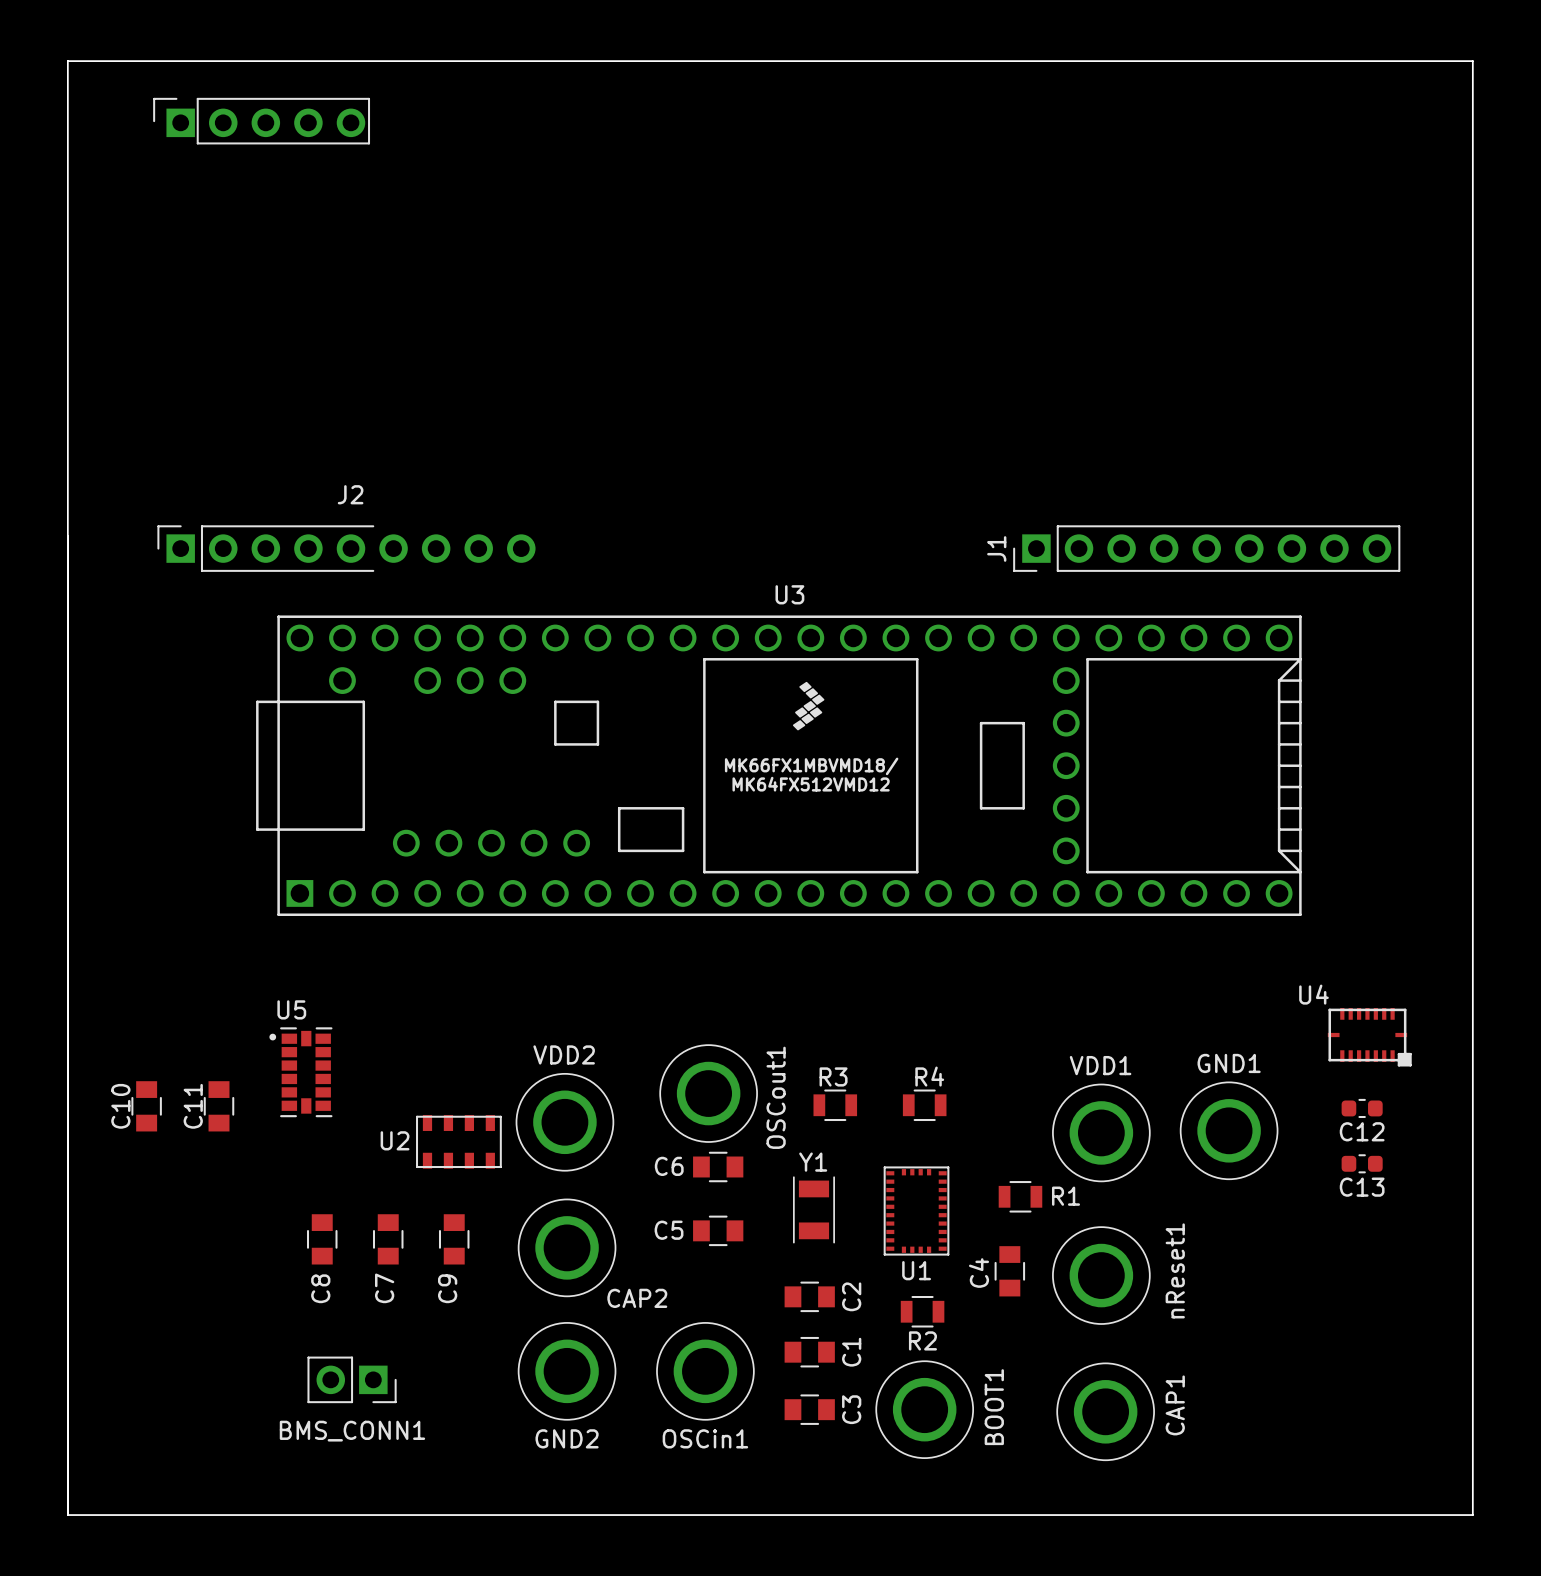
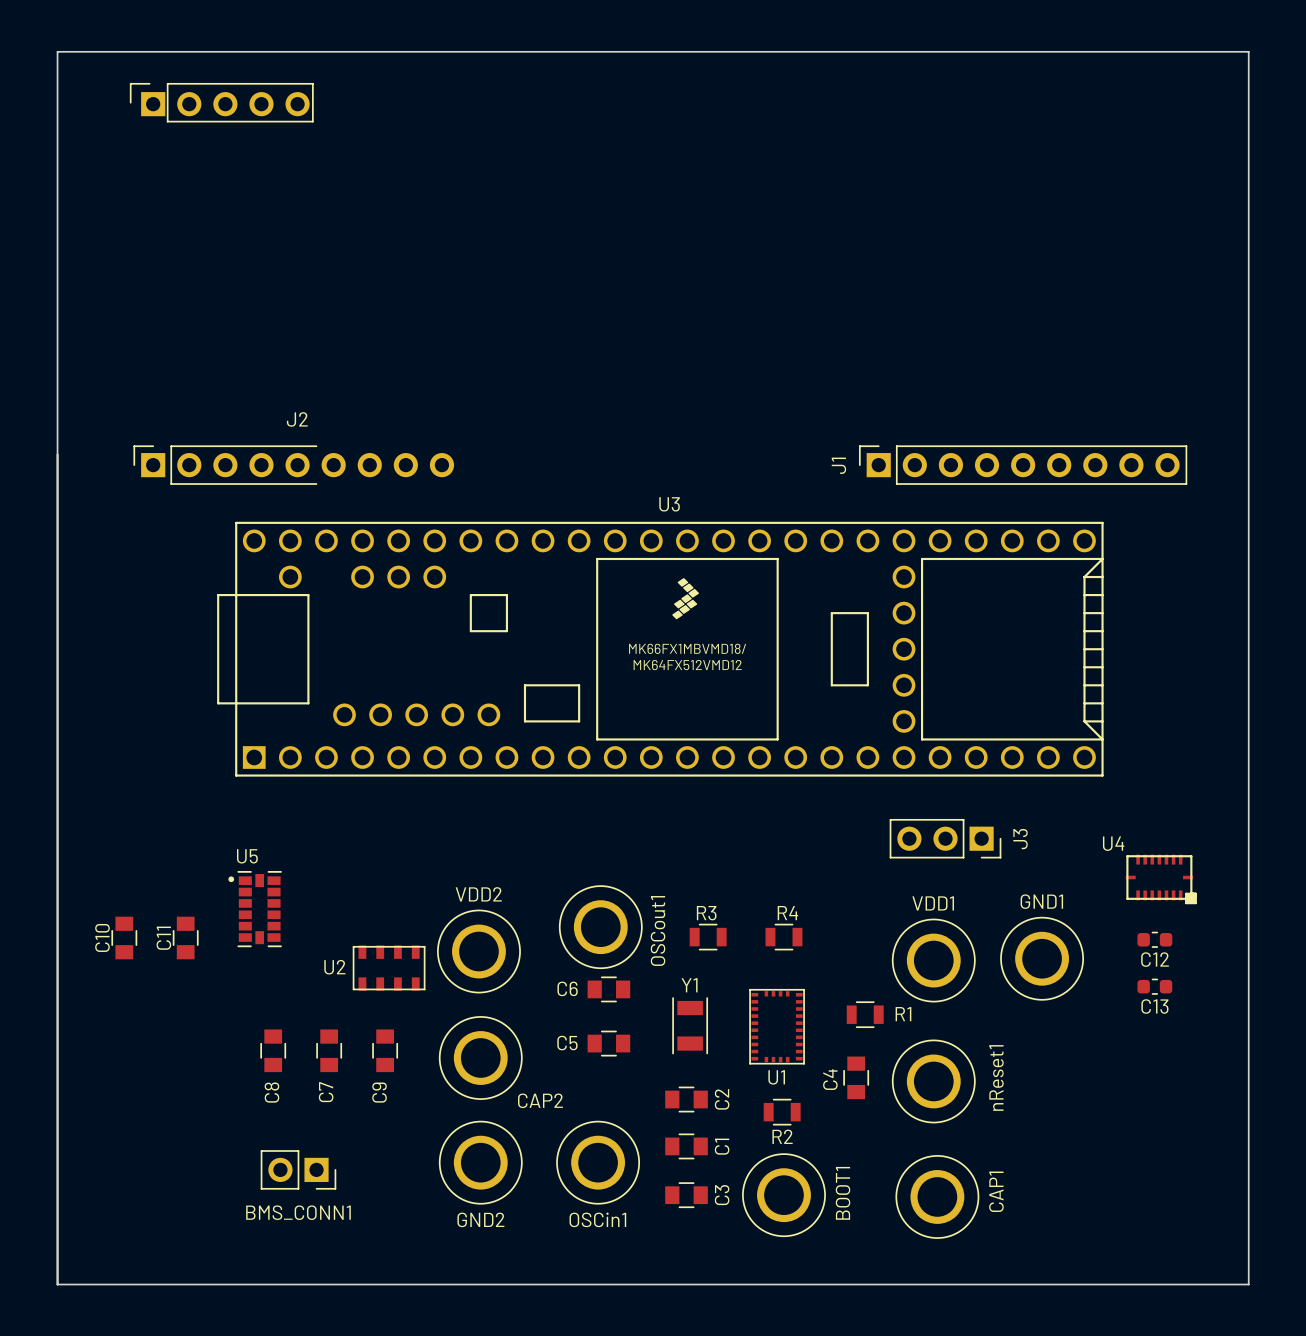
J1 footprint: [1013, 525, 1401, 572] -> [858, 445, 1188, 485]
J3: none -> (945, 838)

